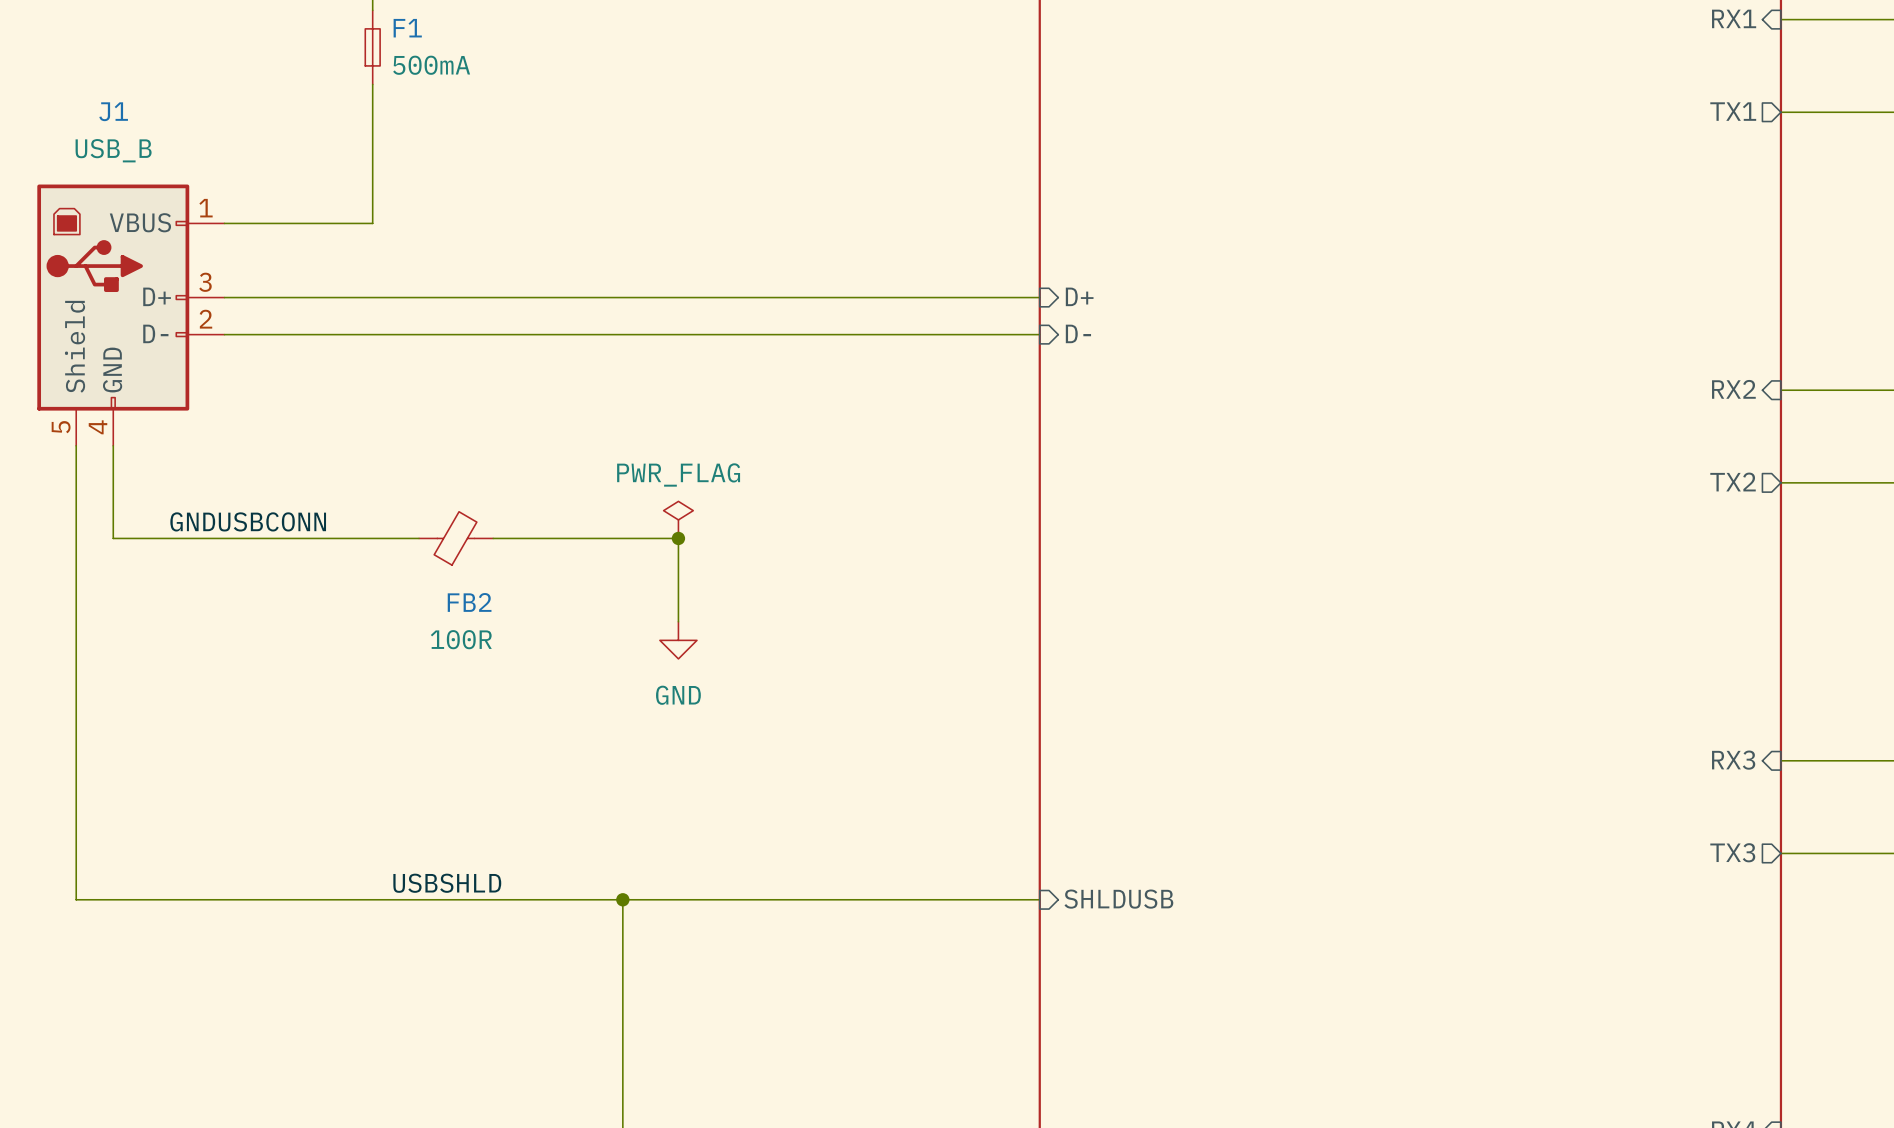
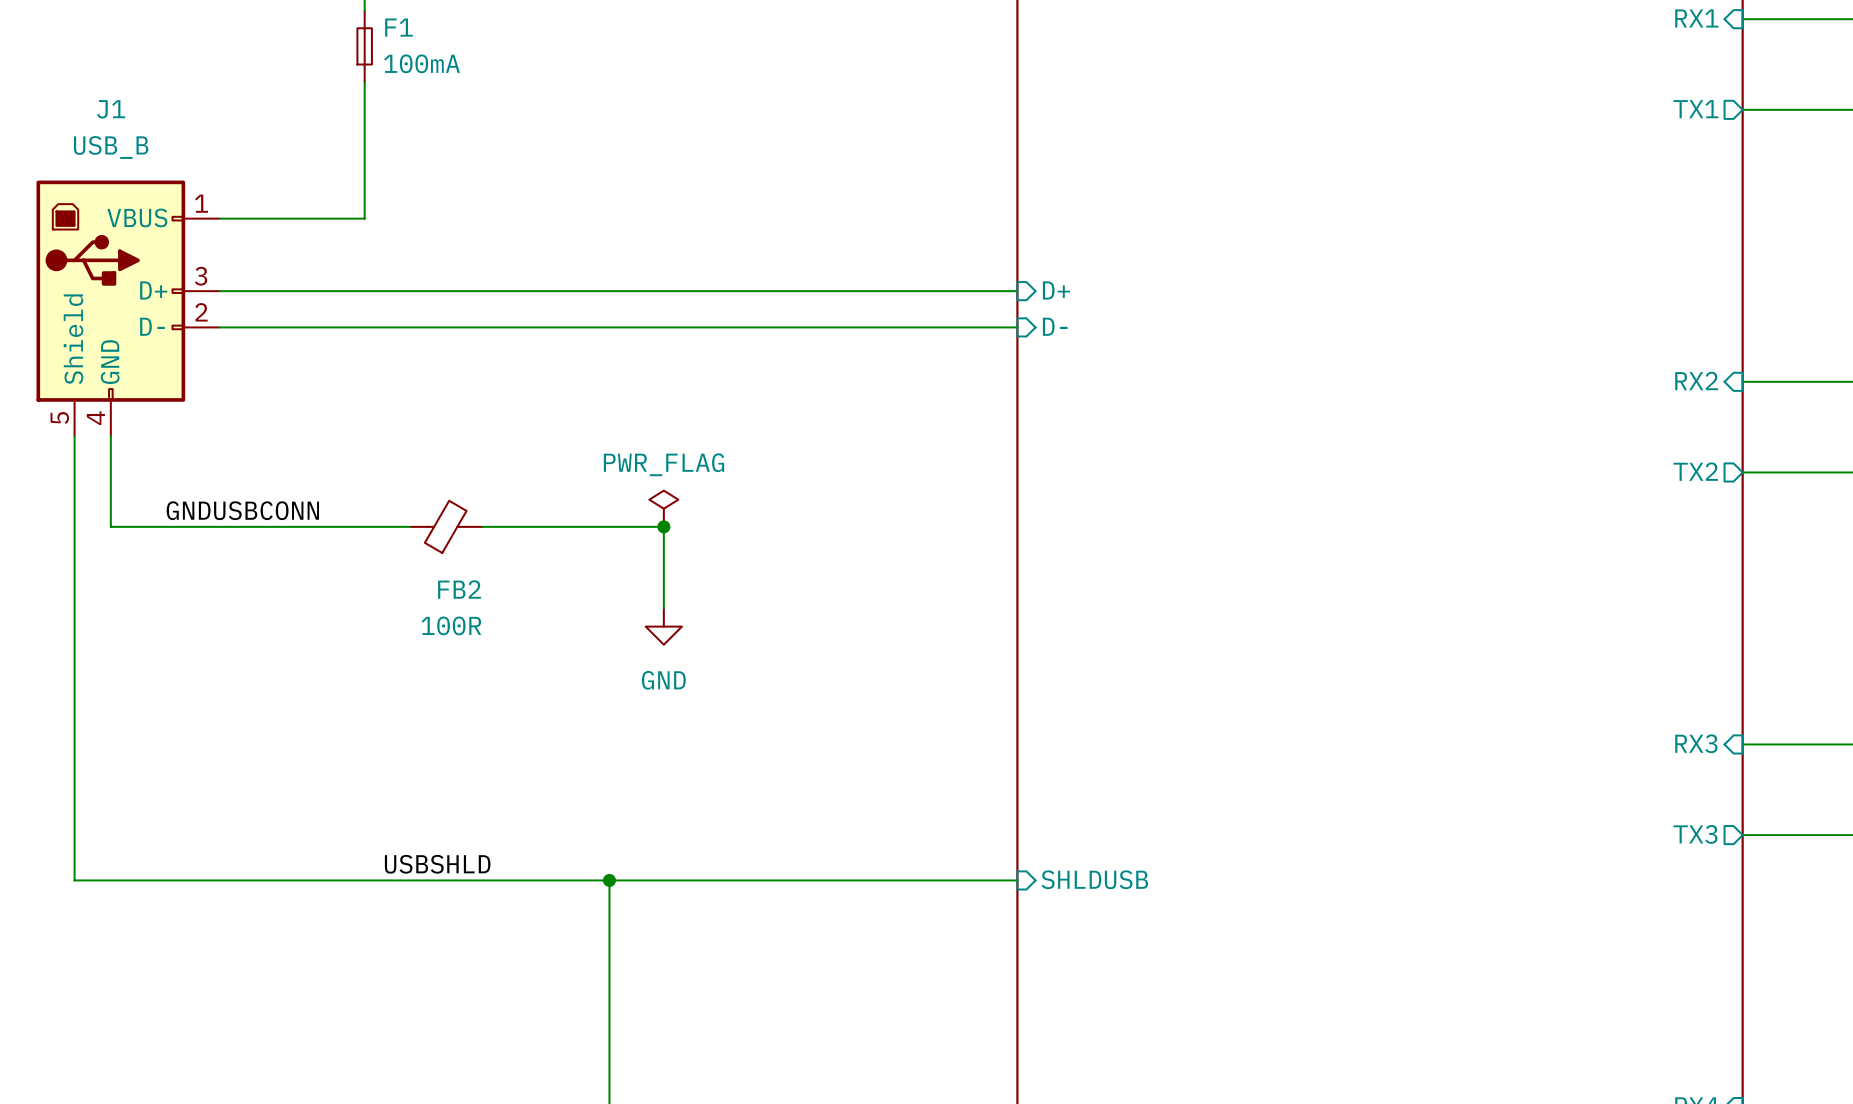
F1 value: 500mA (431, 65) -> 100mA (422, 63)

